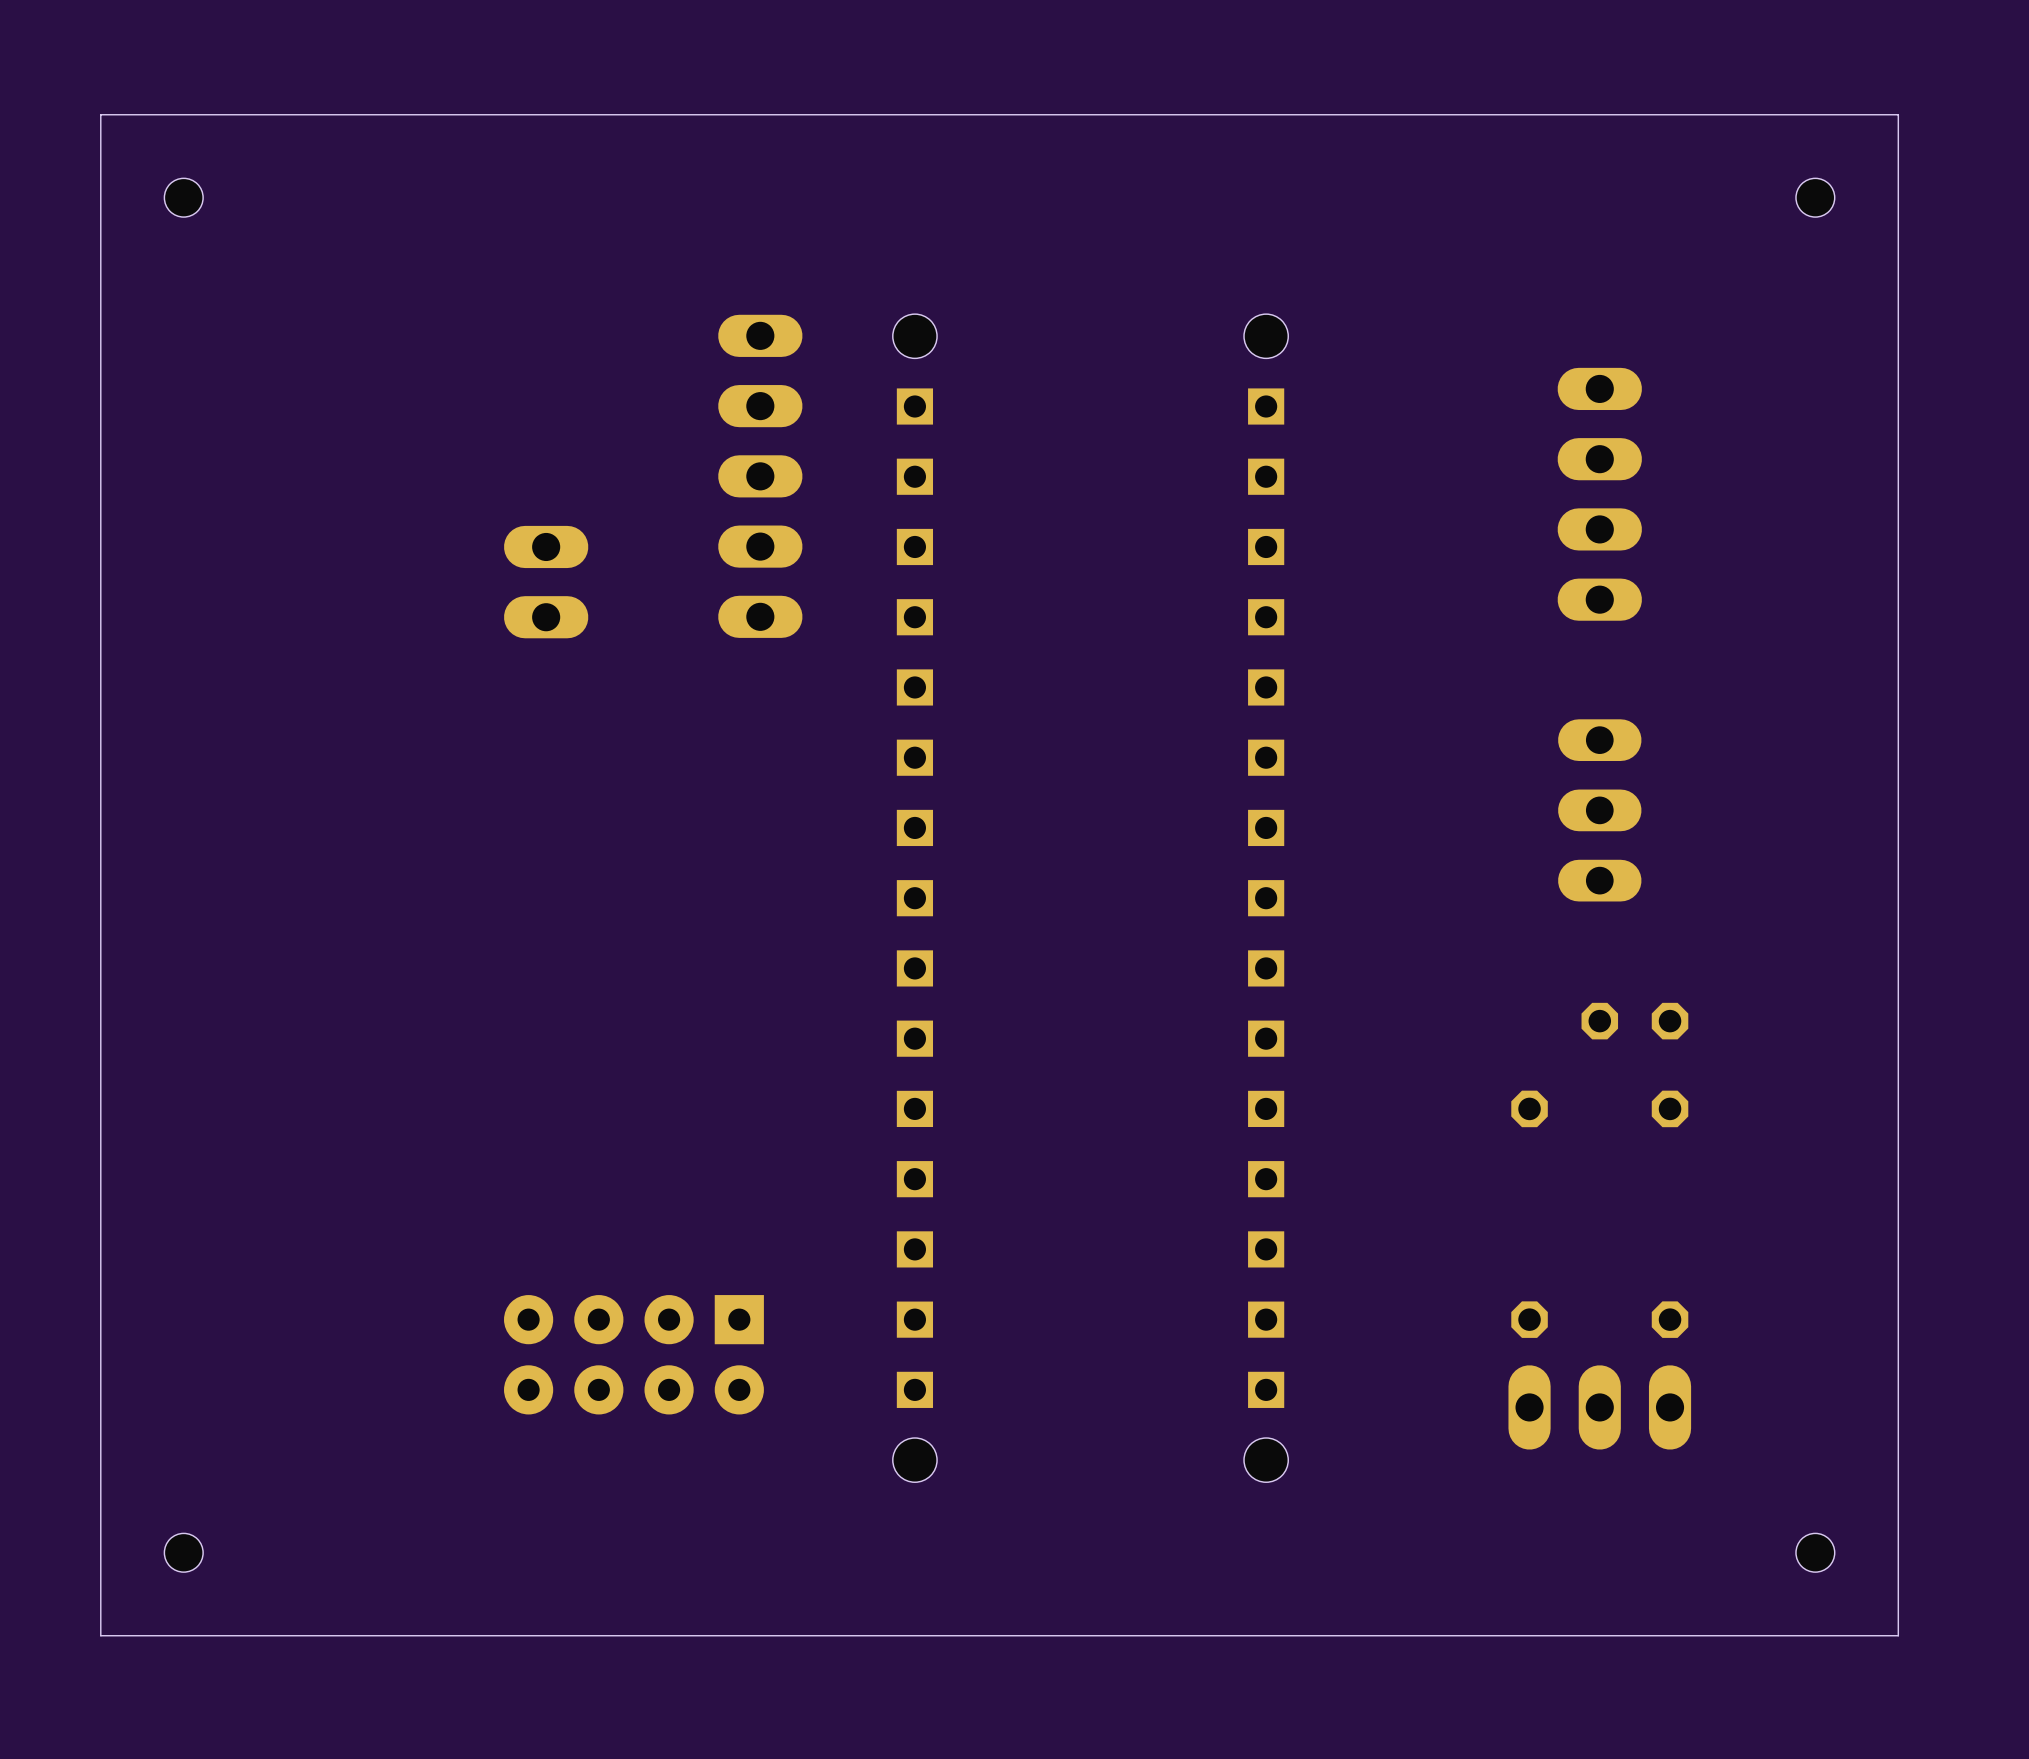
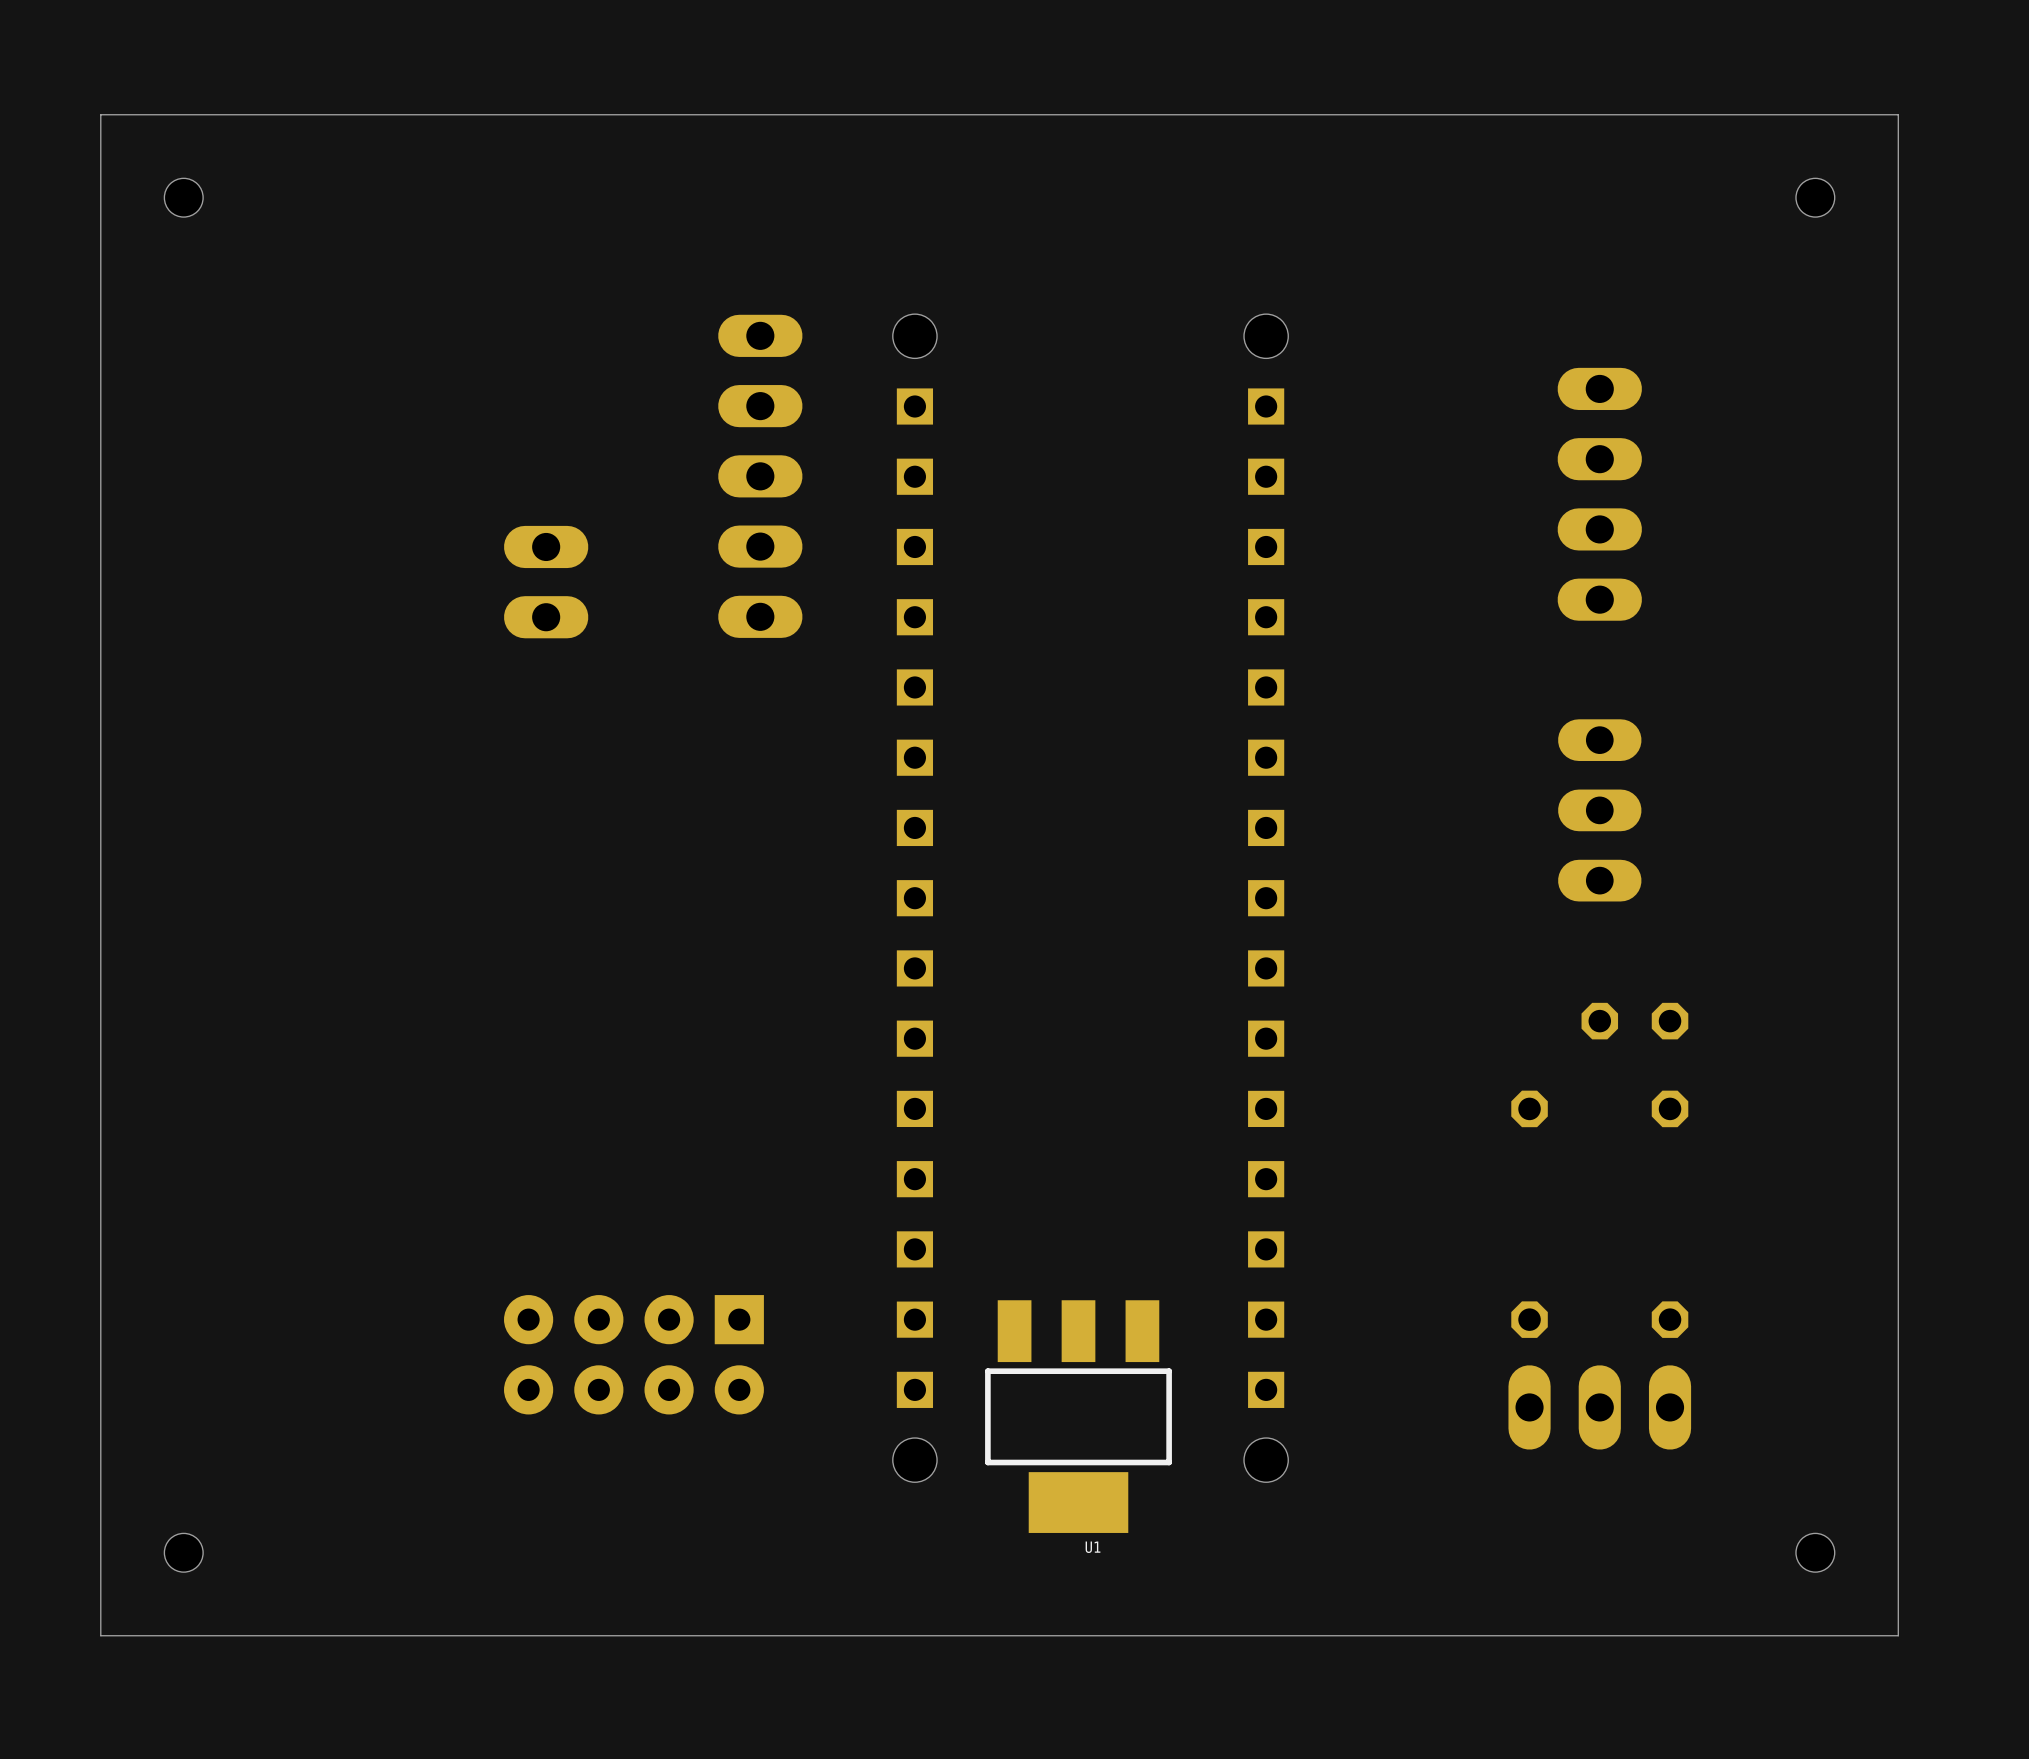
U1: none -> (1078, 1416)

